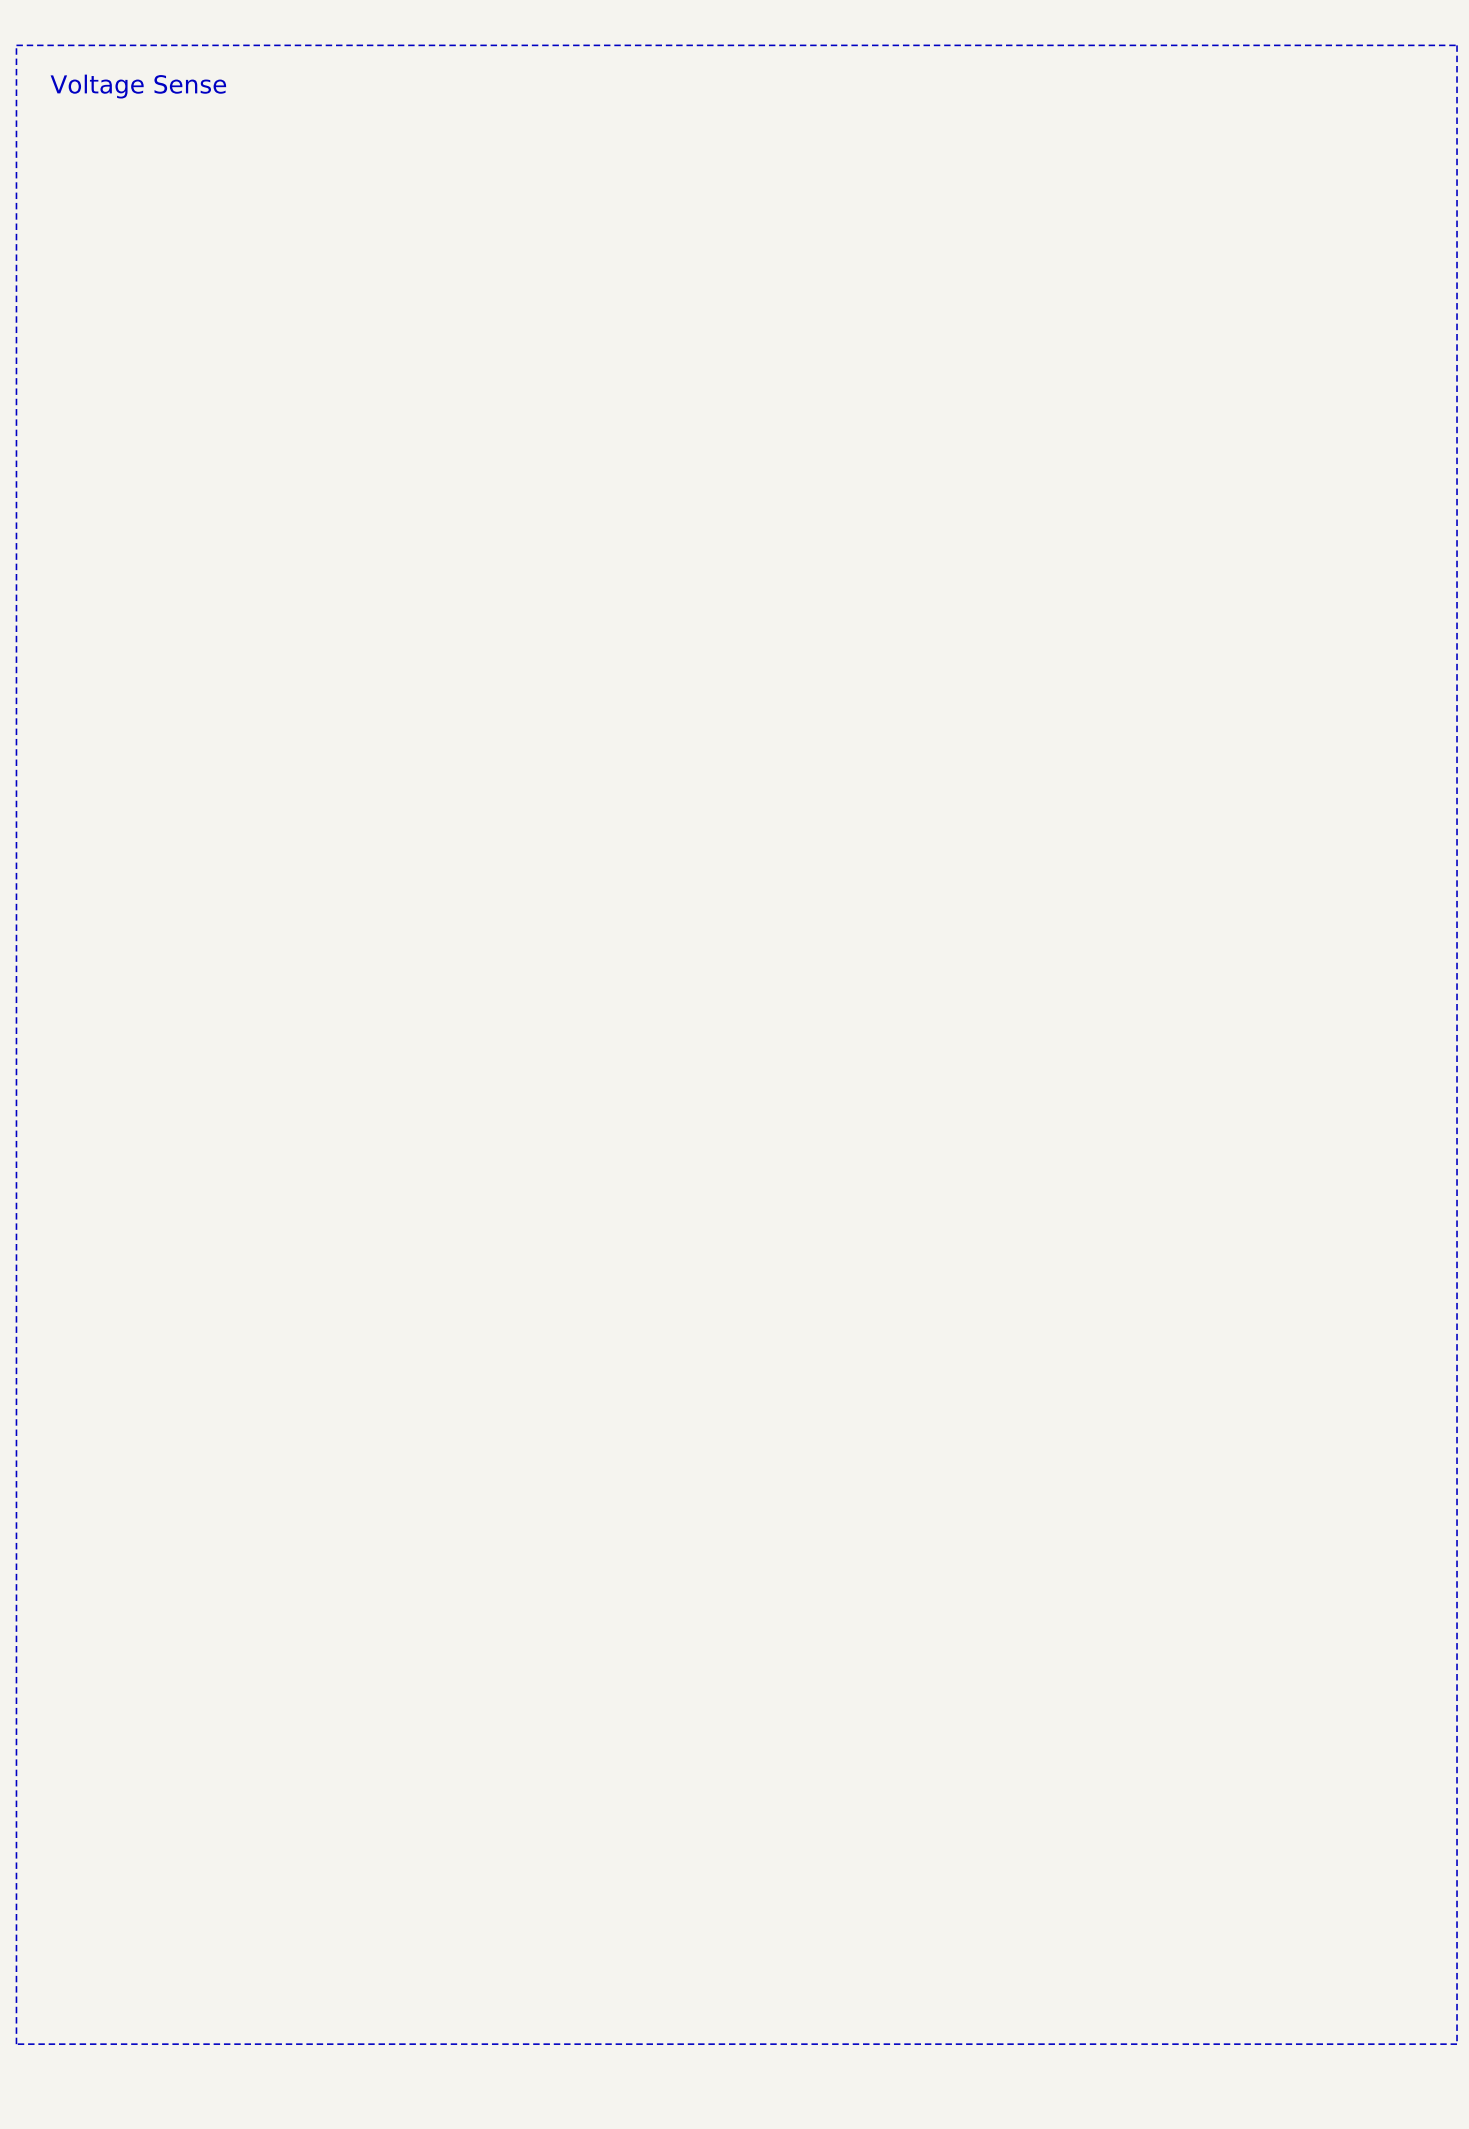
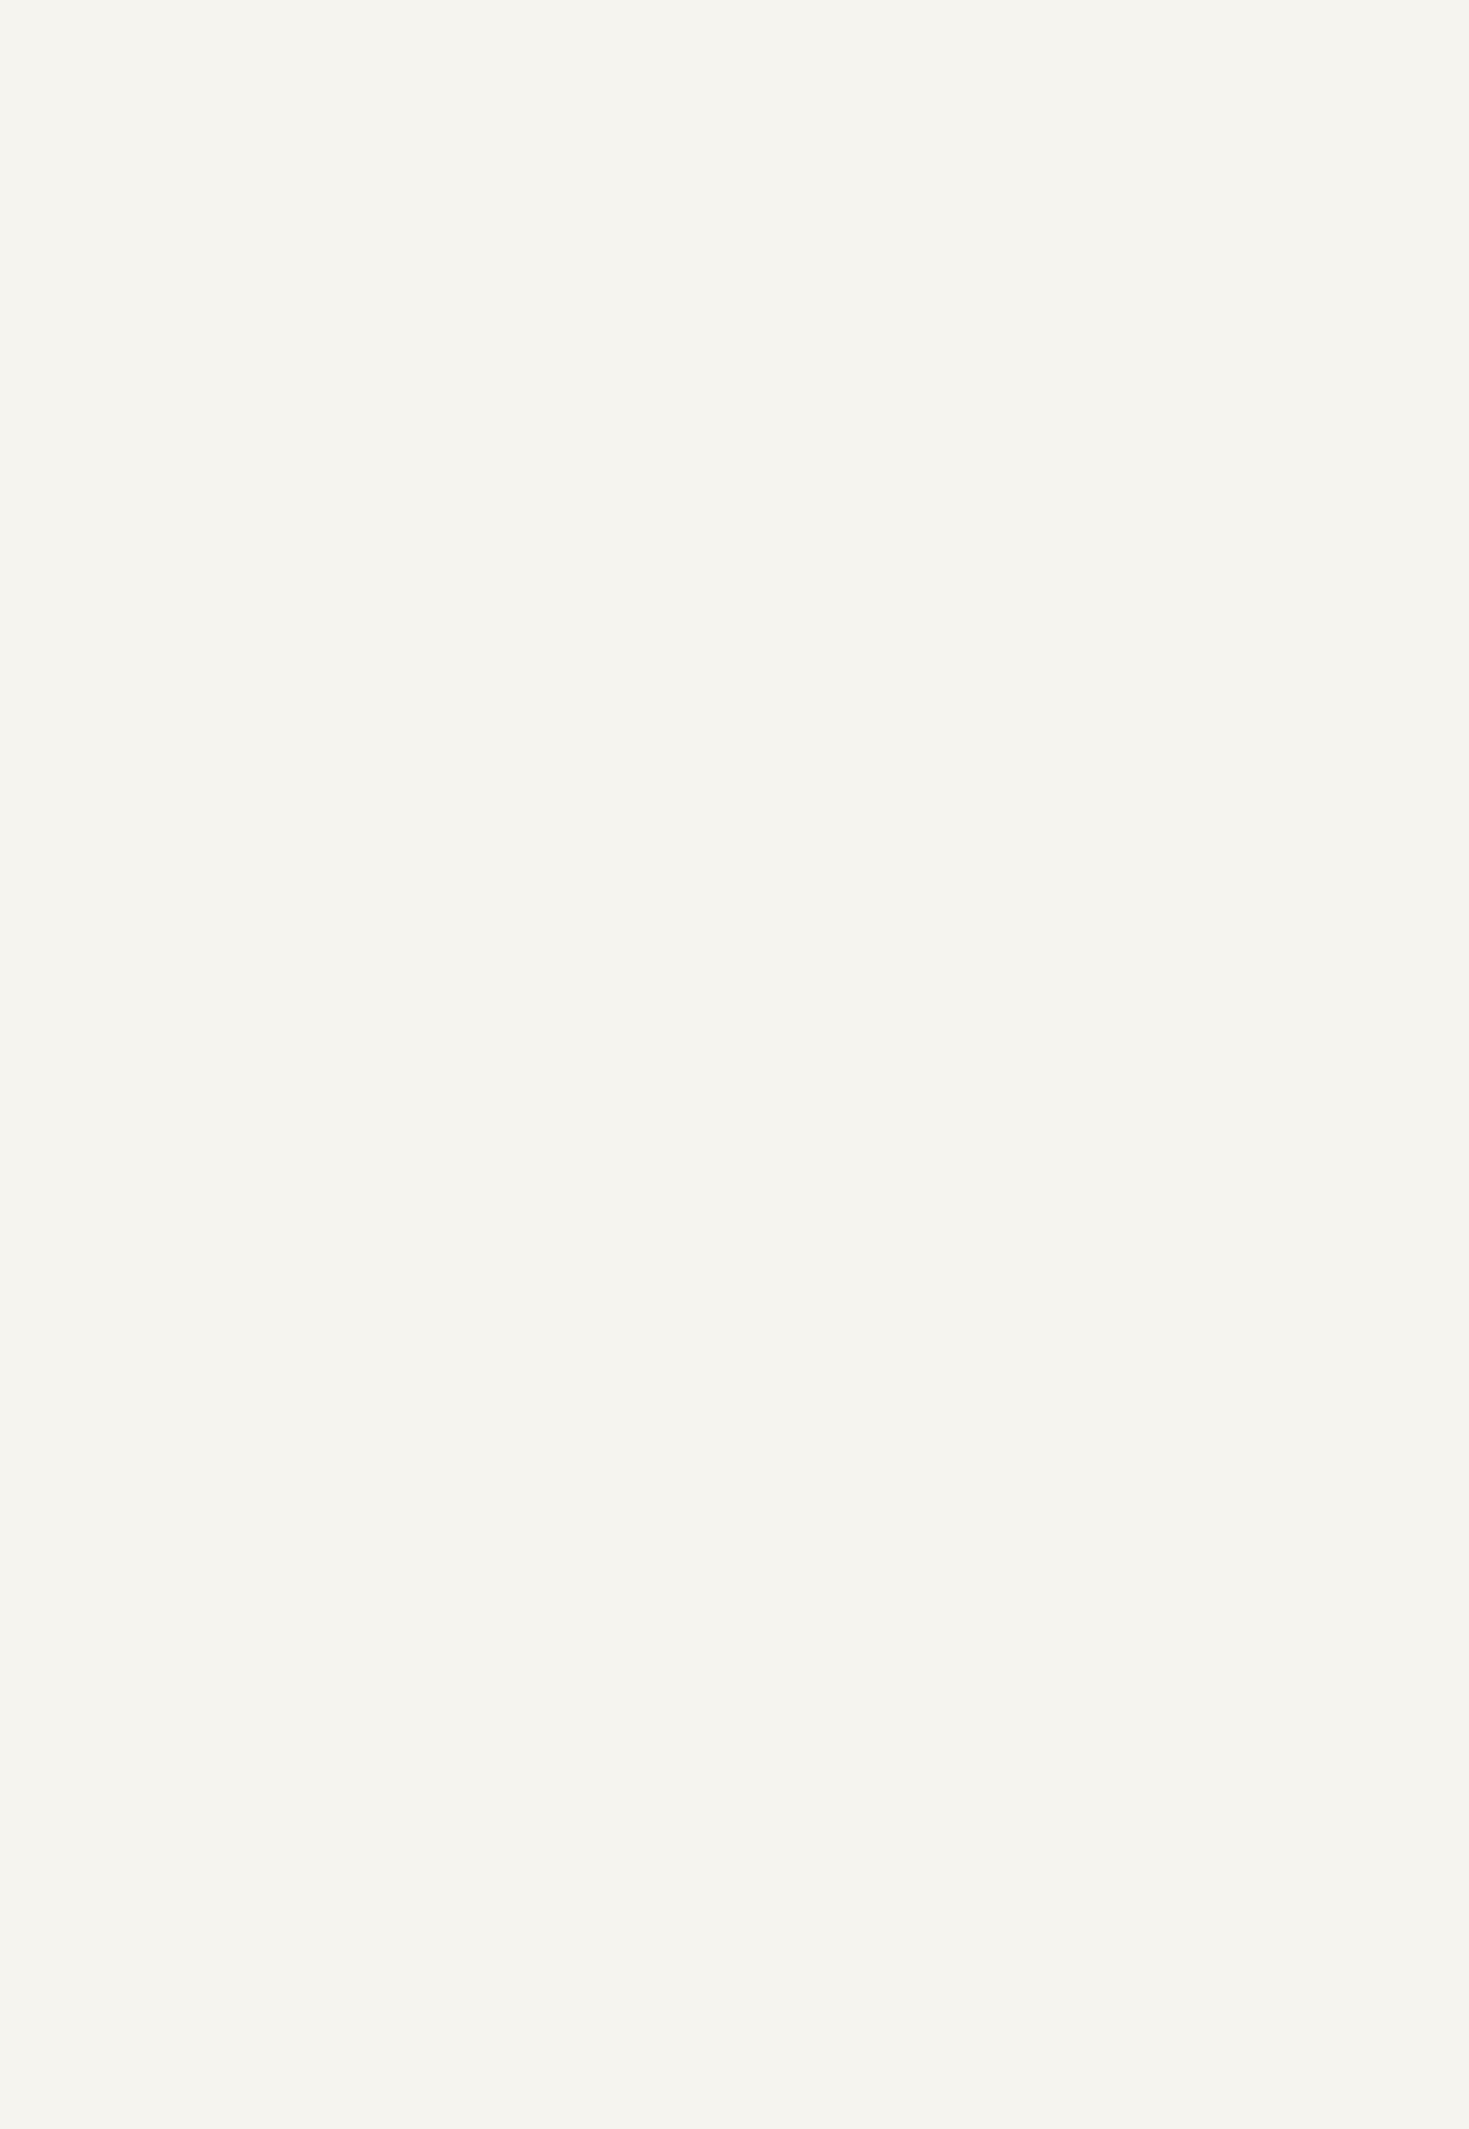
line: (16, 45) (1457, 45) (1457, 2044) (16, 2044) (16, 45) -> none
text: Voltage Sense (138, 86) -> none

